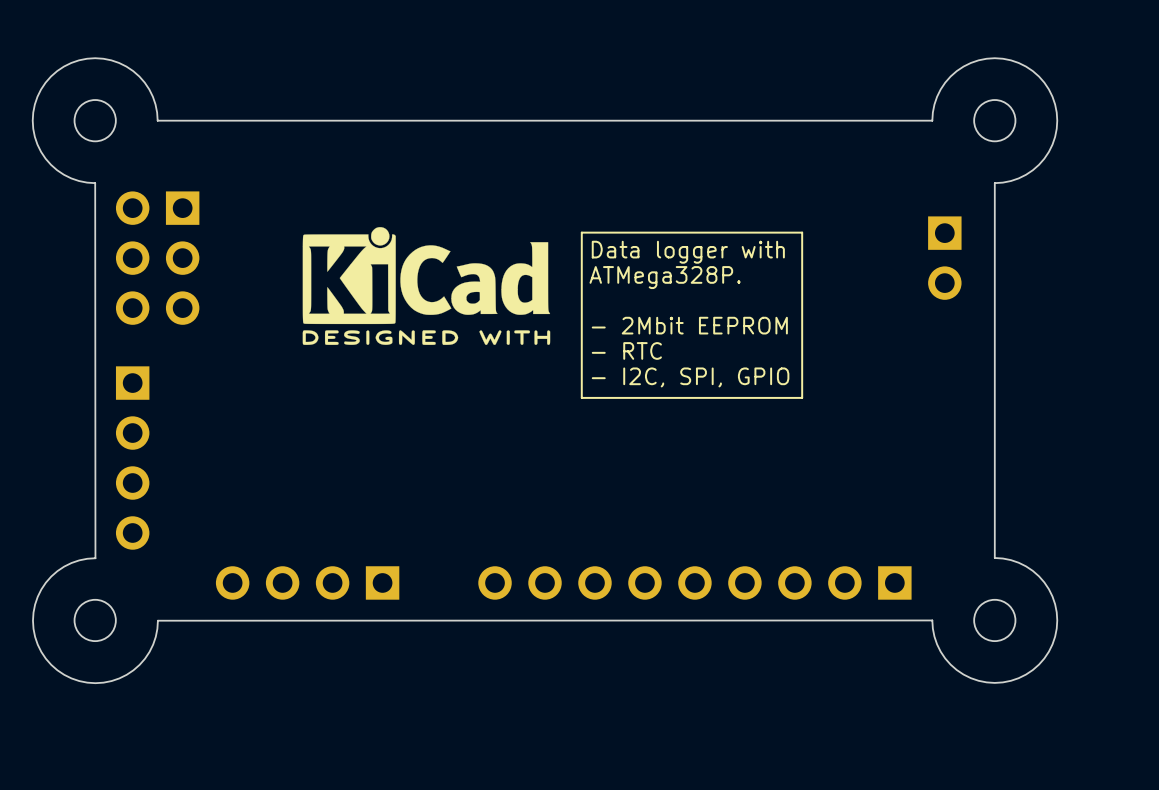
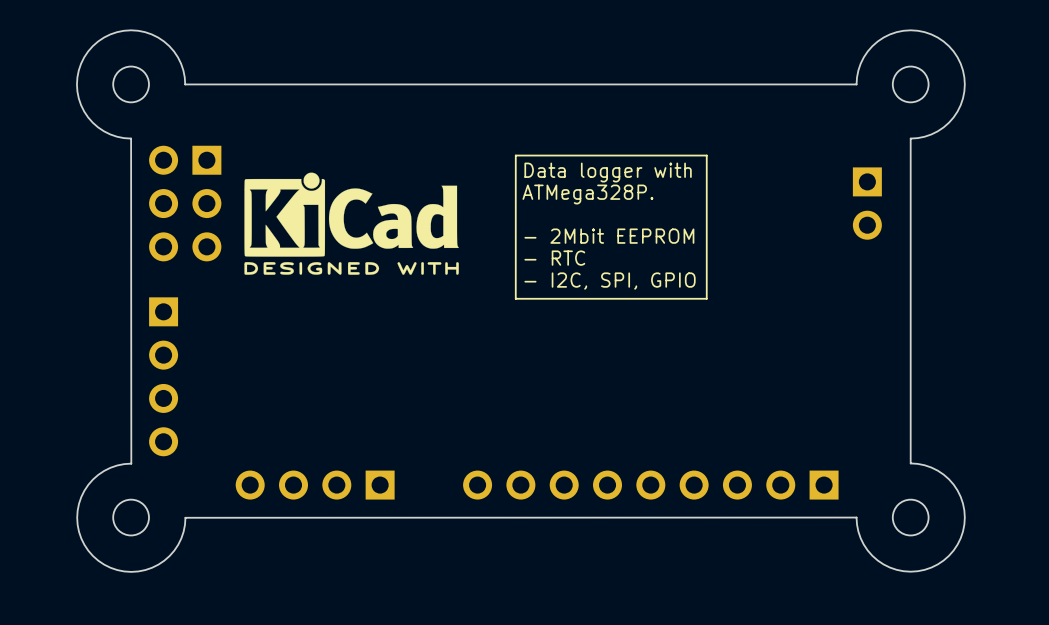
line: (802, 232) (581, 232) (581, 397) (802, 397) (802, 232) -> (706, 155) (515, 155) (515, 298) (706, 298) (706, 155)
text position: Data logger with (688, 252) -> Data logger with (608, 172)
text position: ATMega328P. (665, 277) -> ATMega328P. (587, 194)
drawing position: (426, 286) -> (351, 223)
text position: - 2Mbit EEPROM (689, 325) -> - 2Mbit EEPROM (609, 236)
text position: - RTC (626, 350) -> - RTC (554, 258)
text position: - I2C, SPI, GPIO (690, 377) -> - I2C, SPI, GPIO (610, 281)

